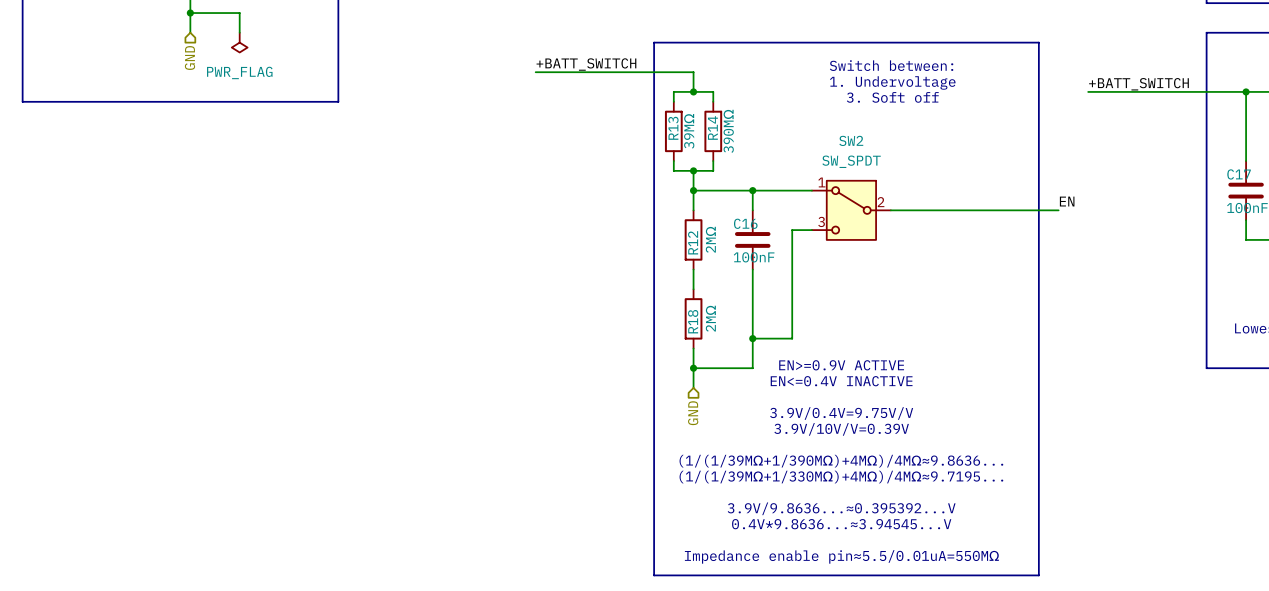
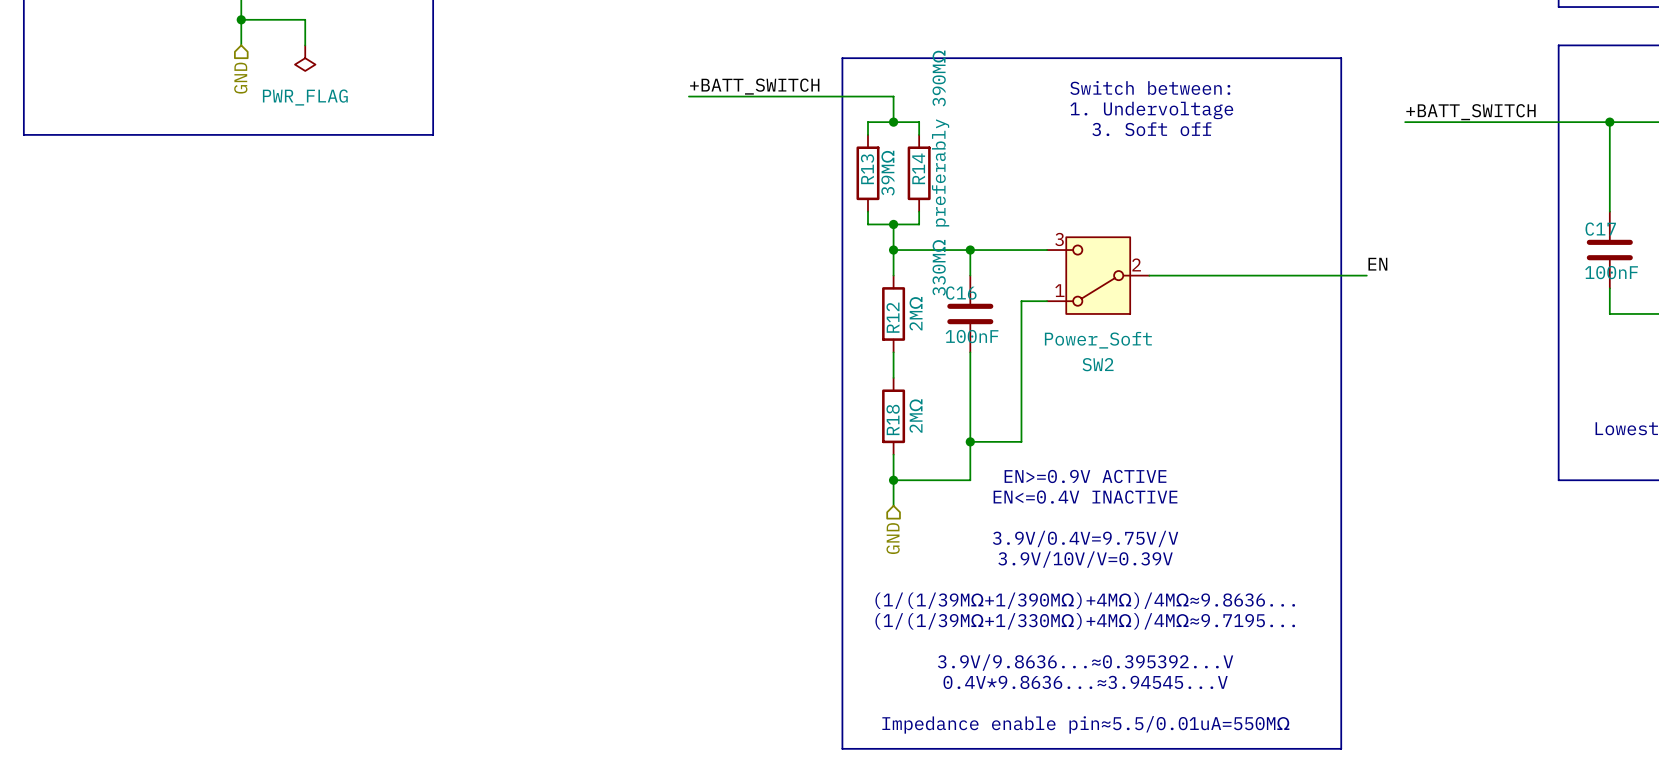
R14 value: 390MΩ (728, 131) -> 330MΩ preferably 390MΩ (940, 173)
SW2 value: SW_SPDT (851, 161) -> Power_Soft (1098, 340)
SW2 flip: as is (851, 210) -> up-down (1098, 275)

